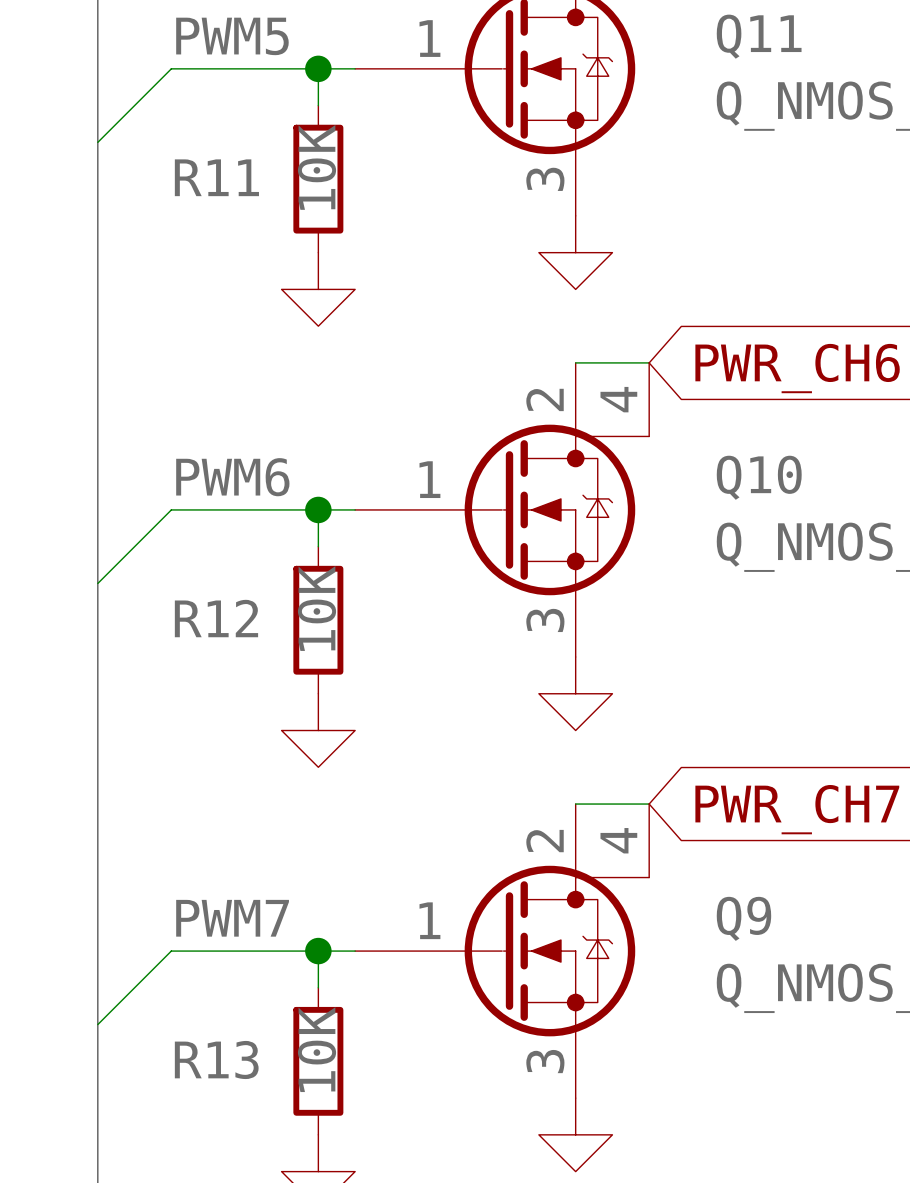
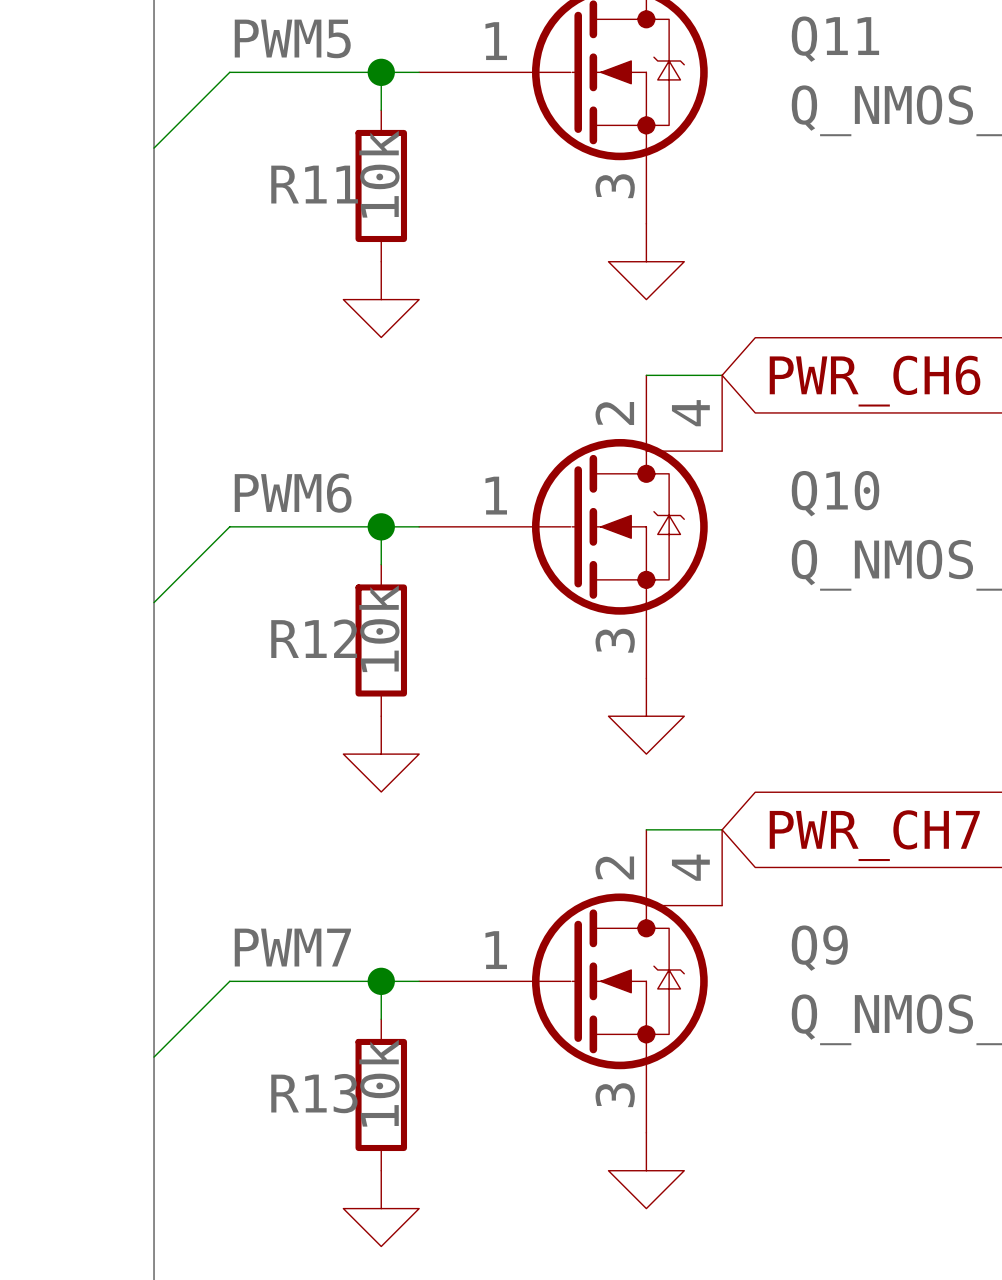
R11 value: 10K (317, 167) -> 10k (379, 174)
R11 name position: R11 (216, 177) -> R11 (314, 184)
R12 value: 10K (317, 608) -> 10k (379, 628)
R12 name position: R12 (216, 618) -> R12 (314, 638)
R13 value: 10K (317, 1049) -> 10k (379, 1083)
R13 name position: R13 (216, 1059) -> R13 (314, 1093)

